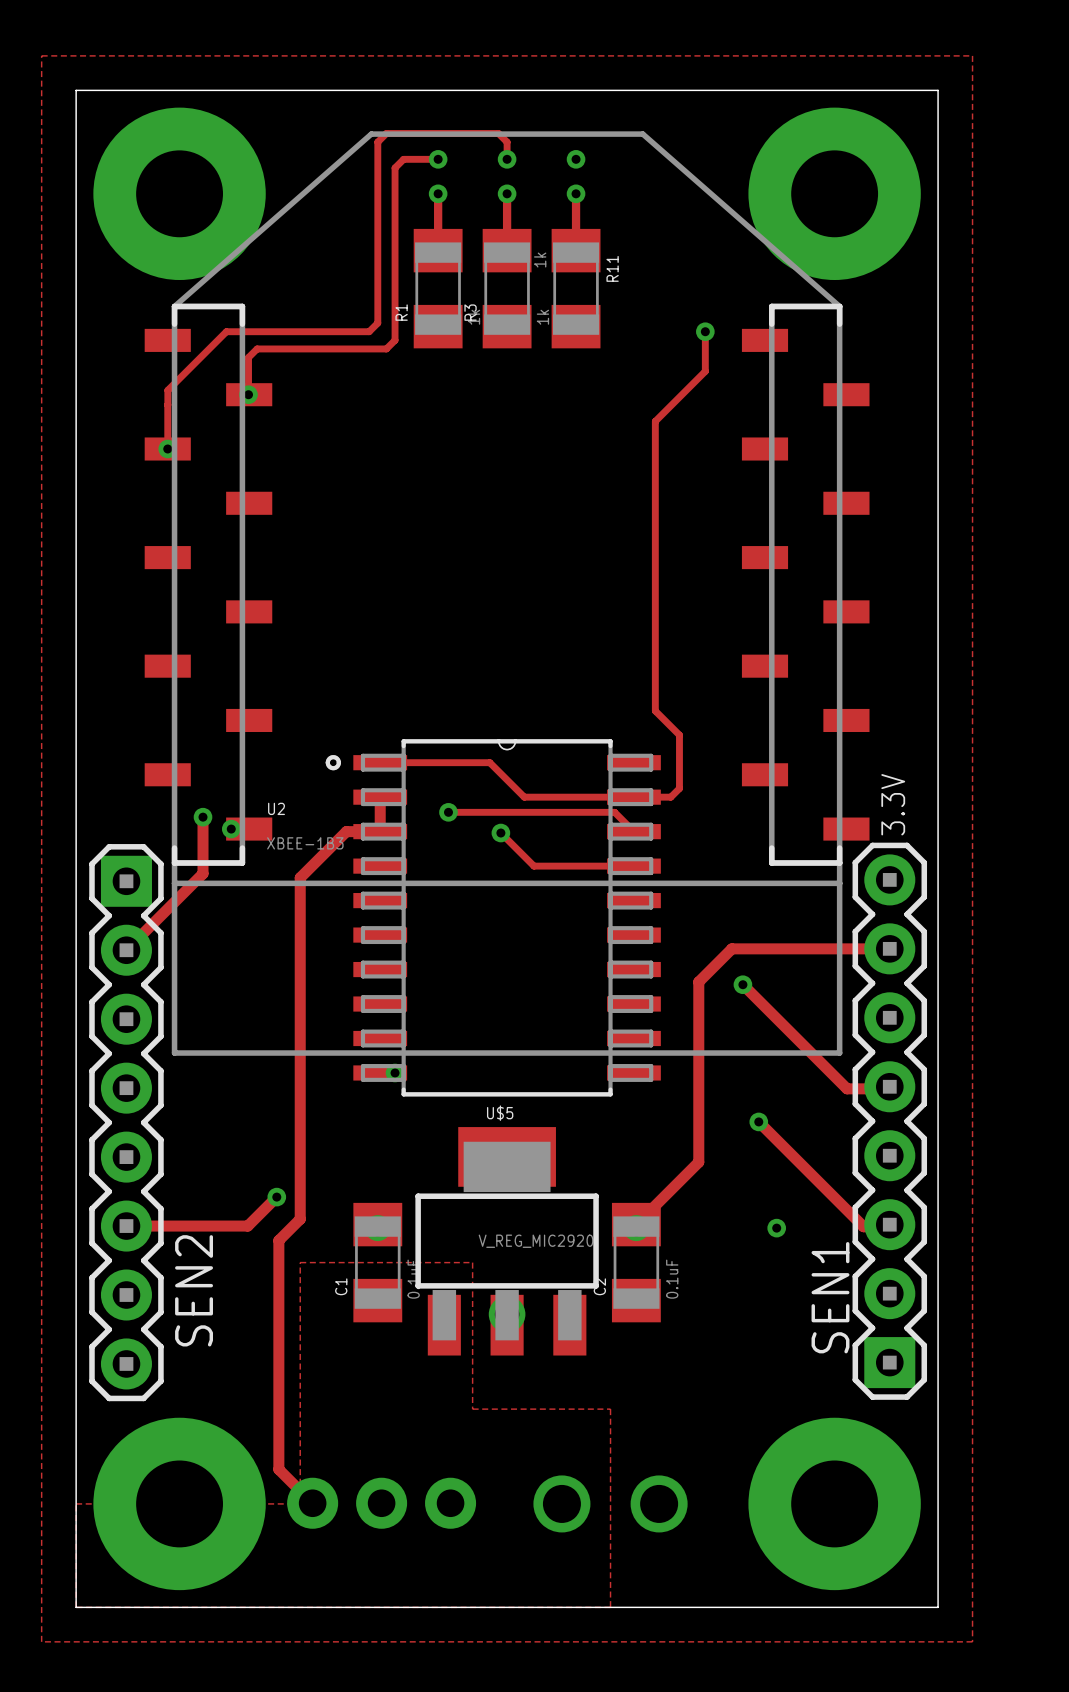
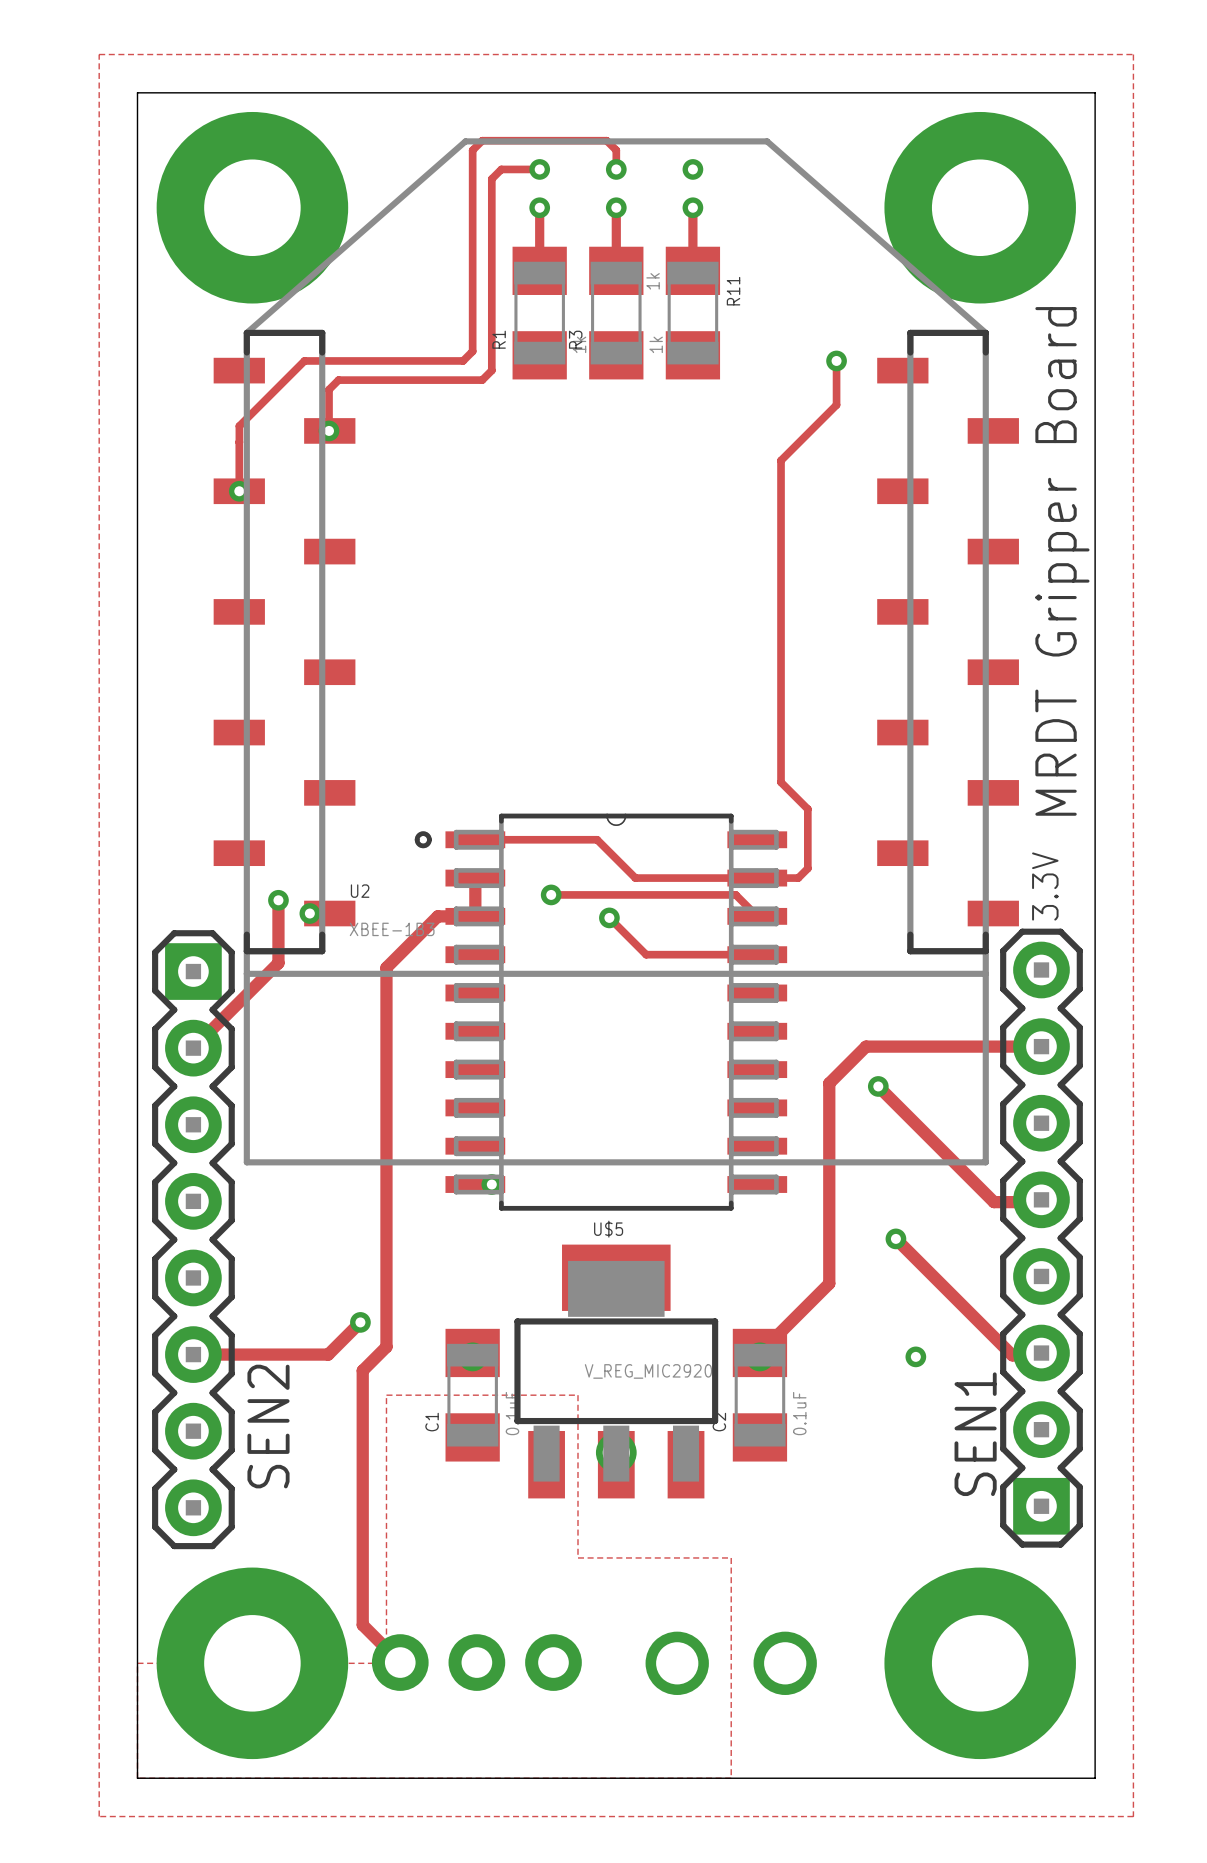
text: none -> MRDT Gripper Board (1062, 561)

